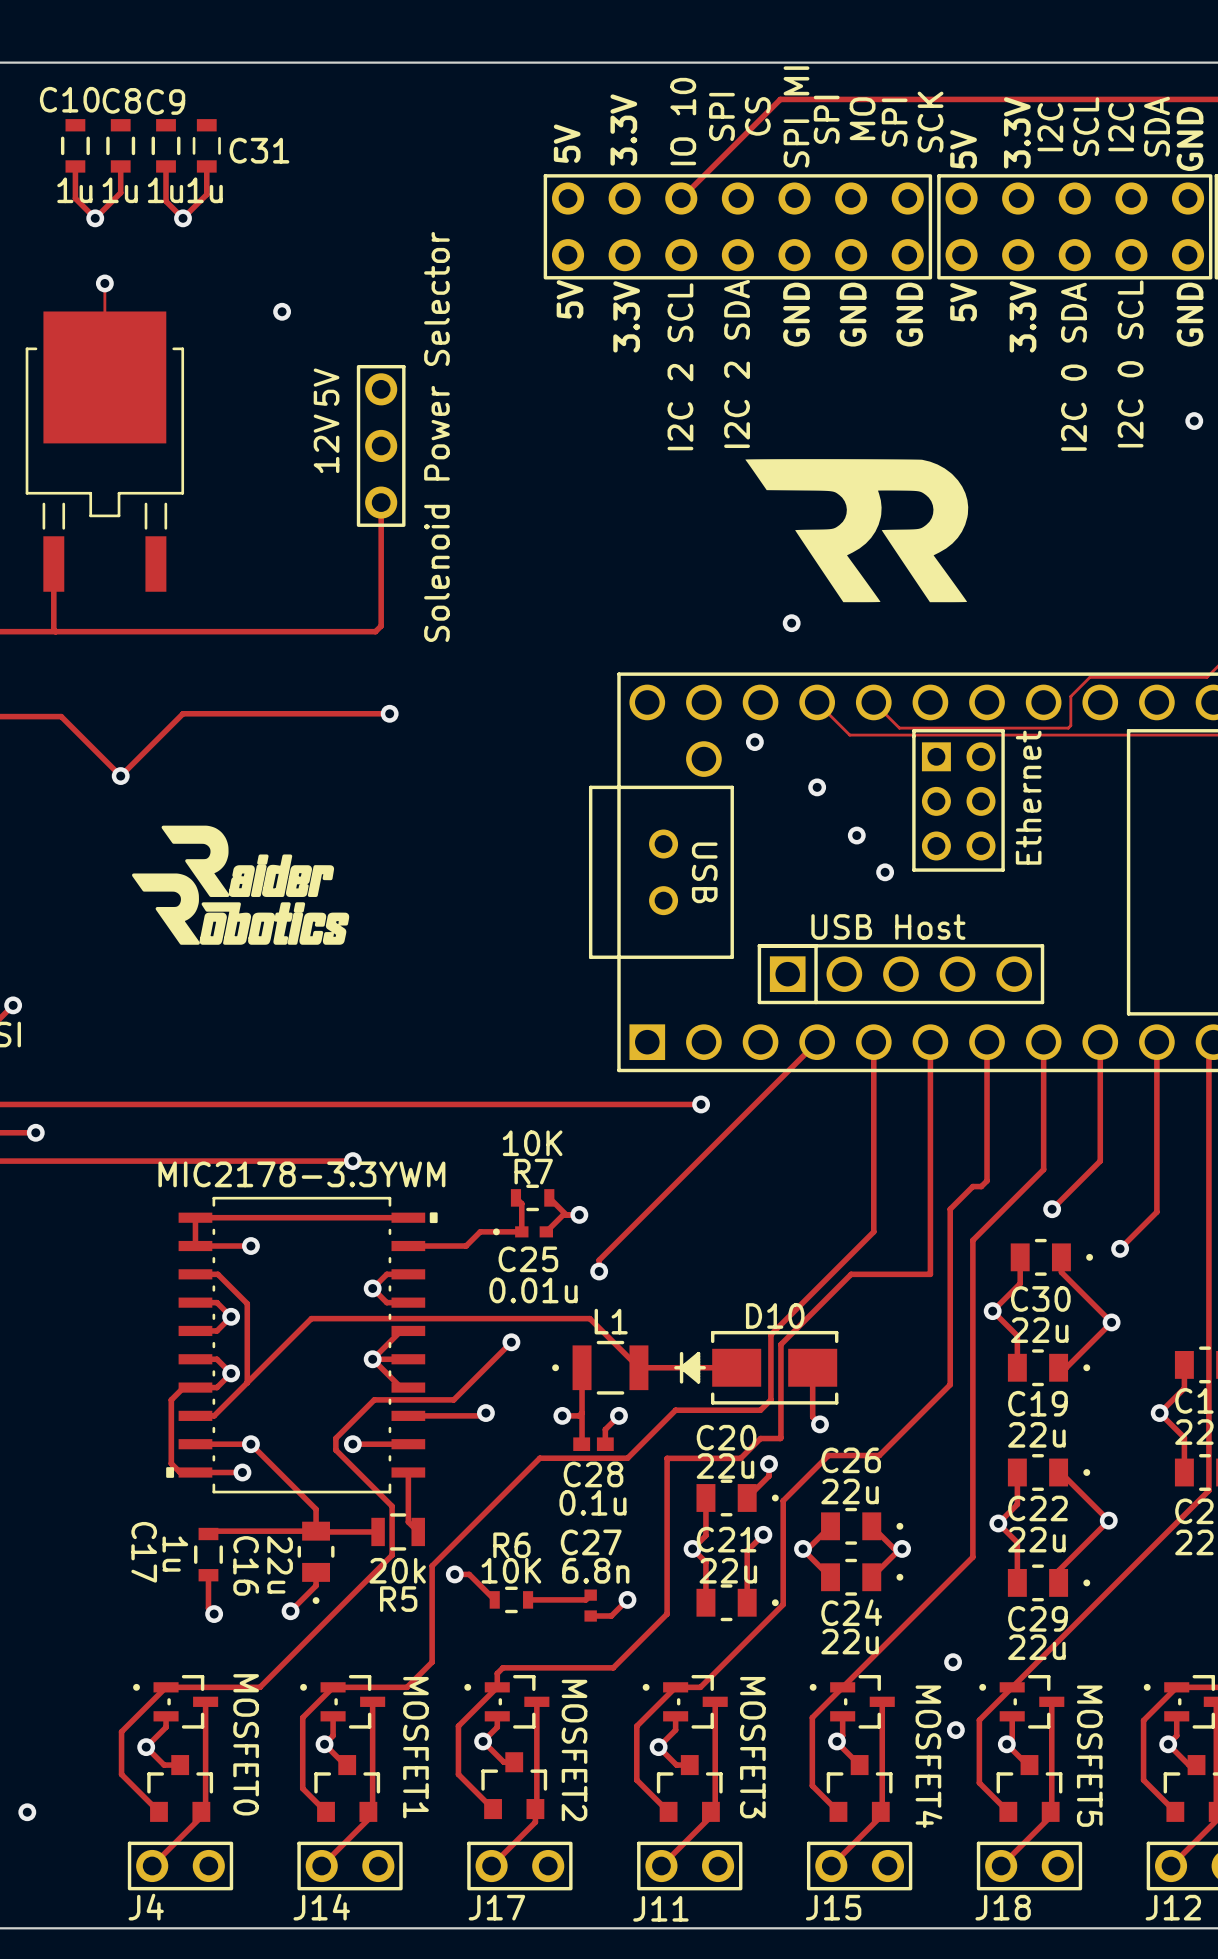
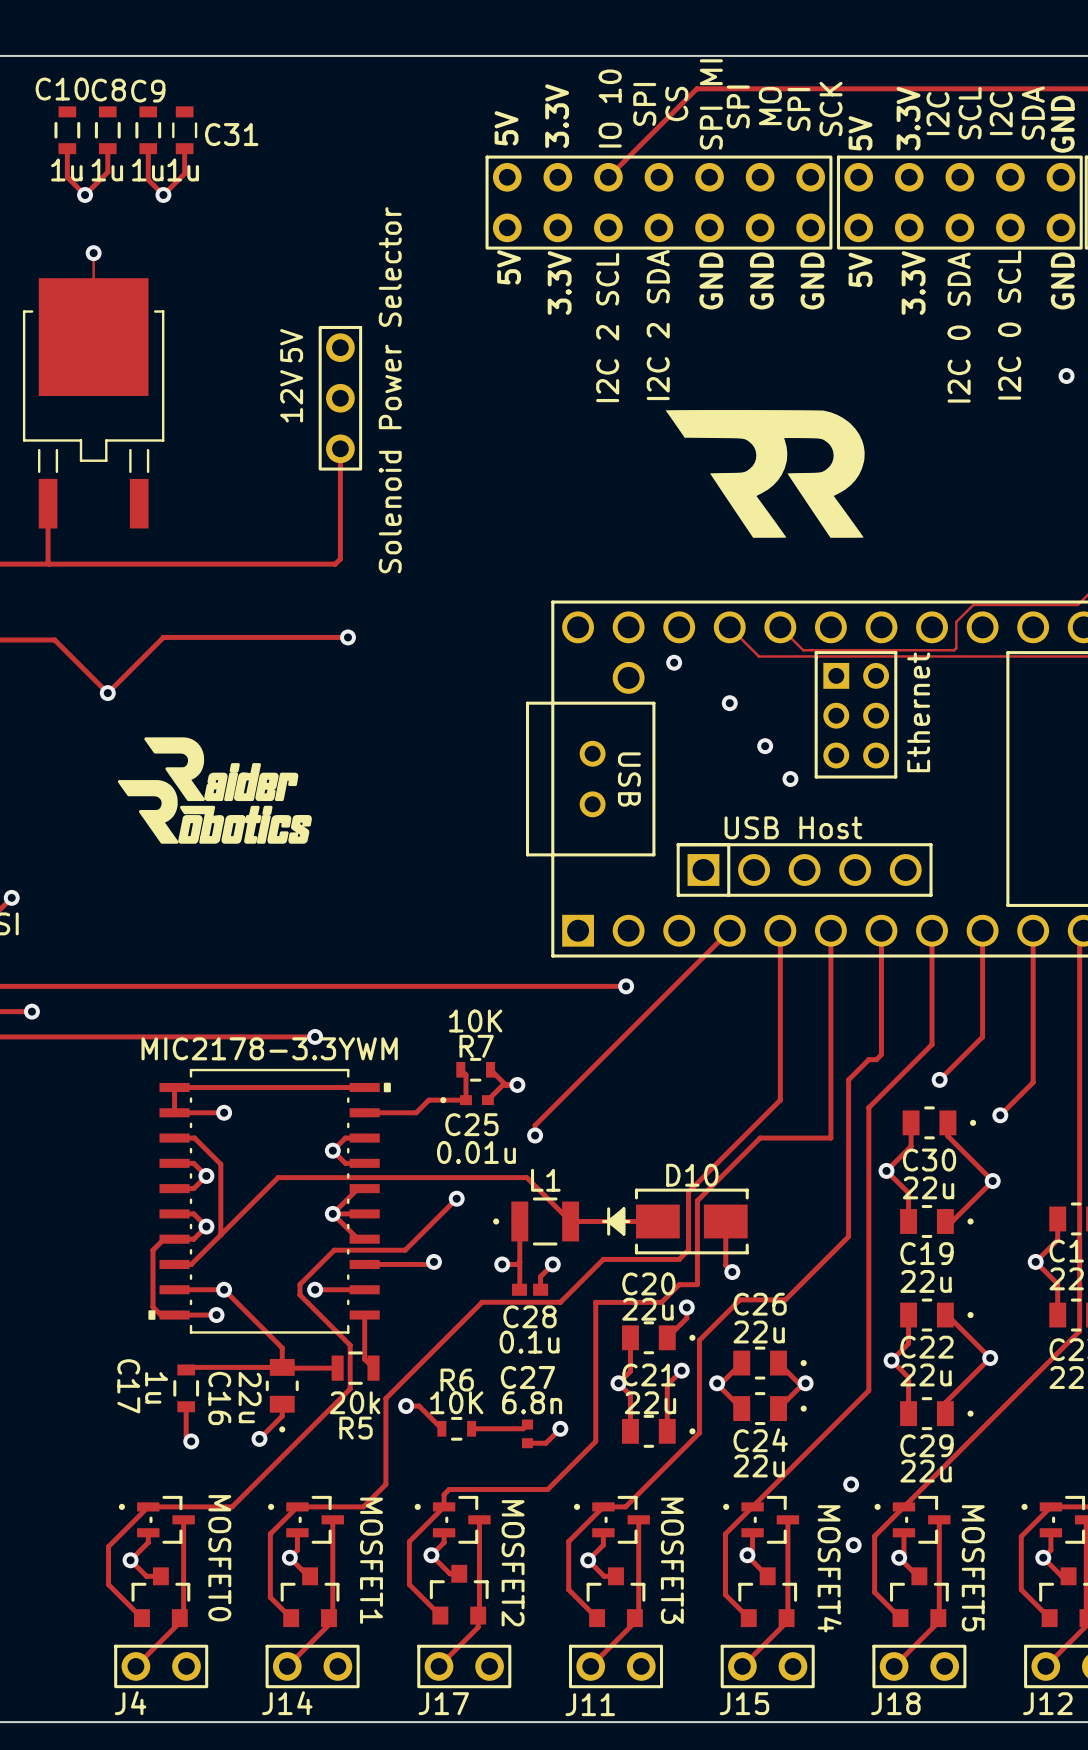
via: (282, 311) -> none
via: (791, 623) -> none
via: (27, 1812) -> none

